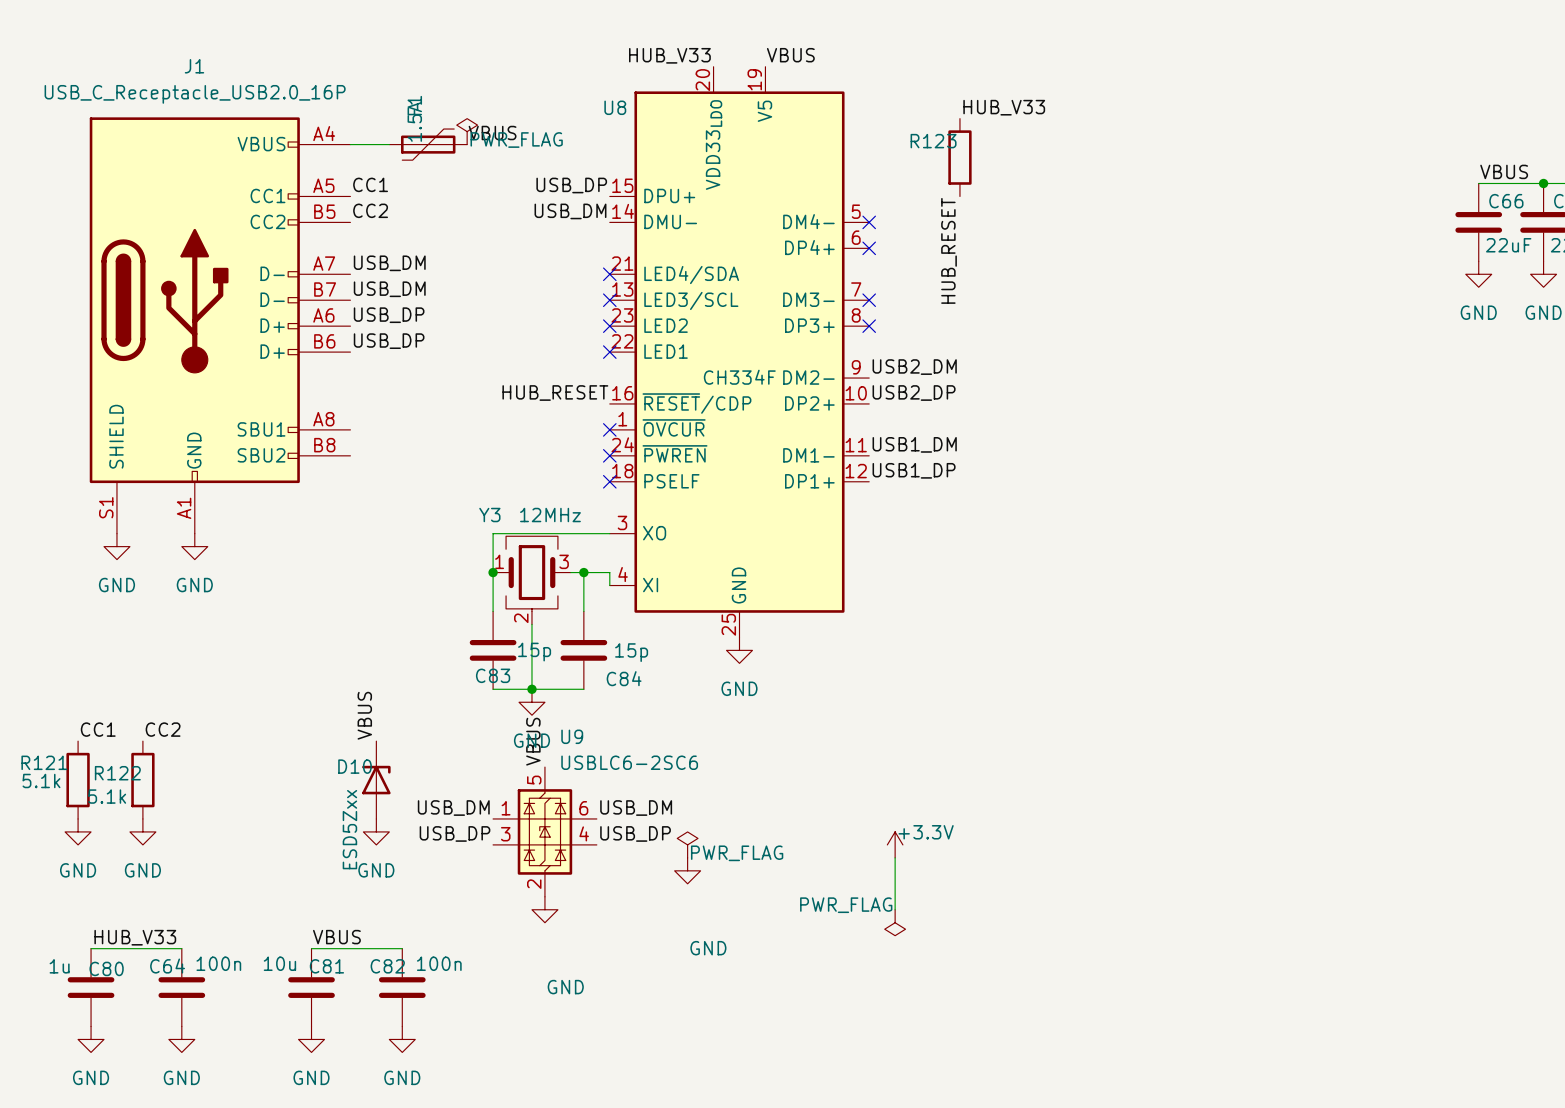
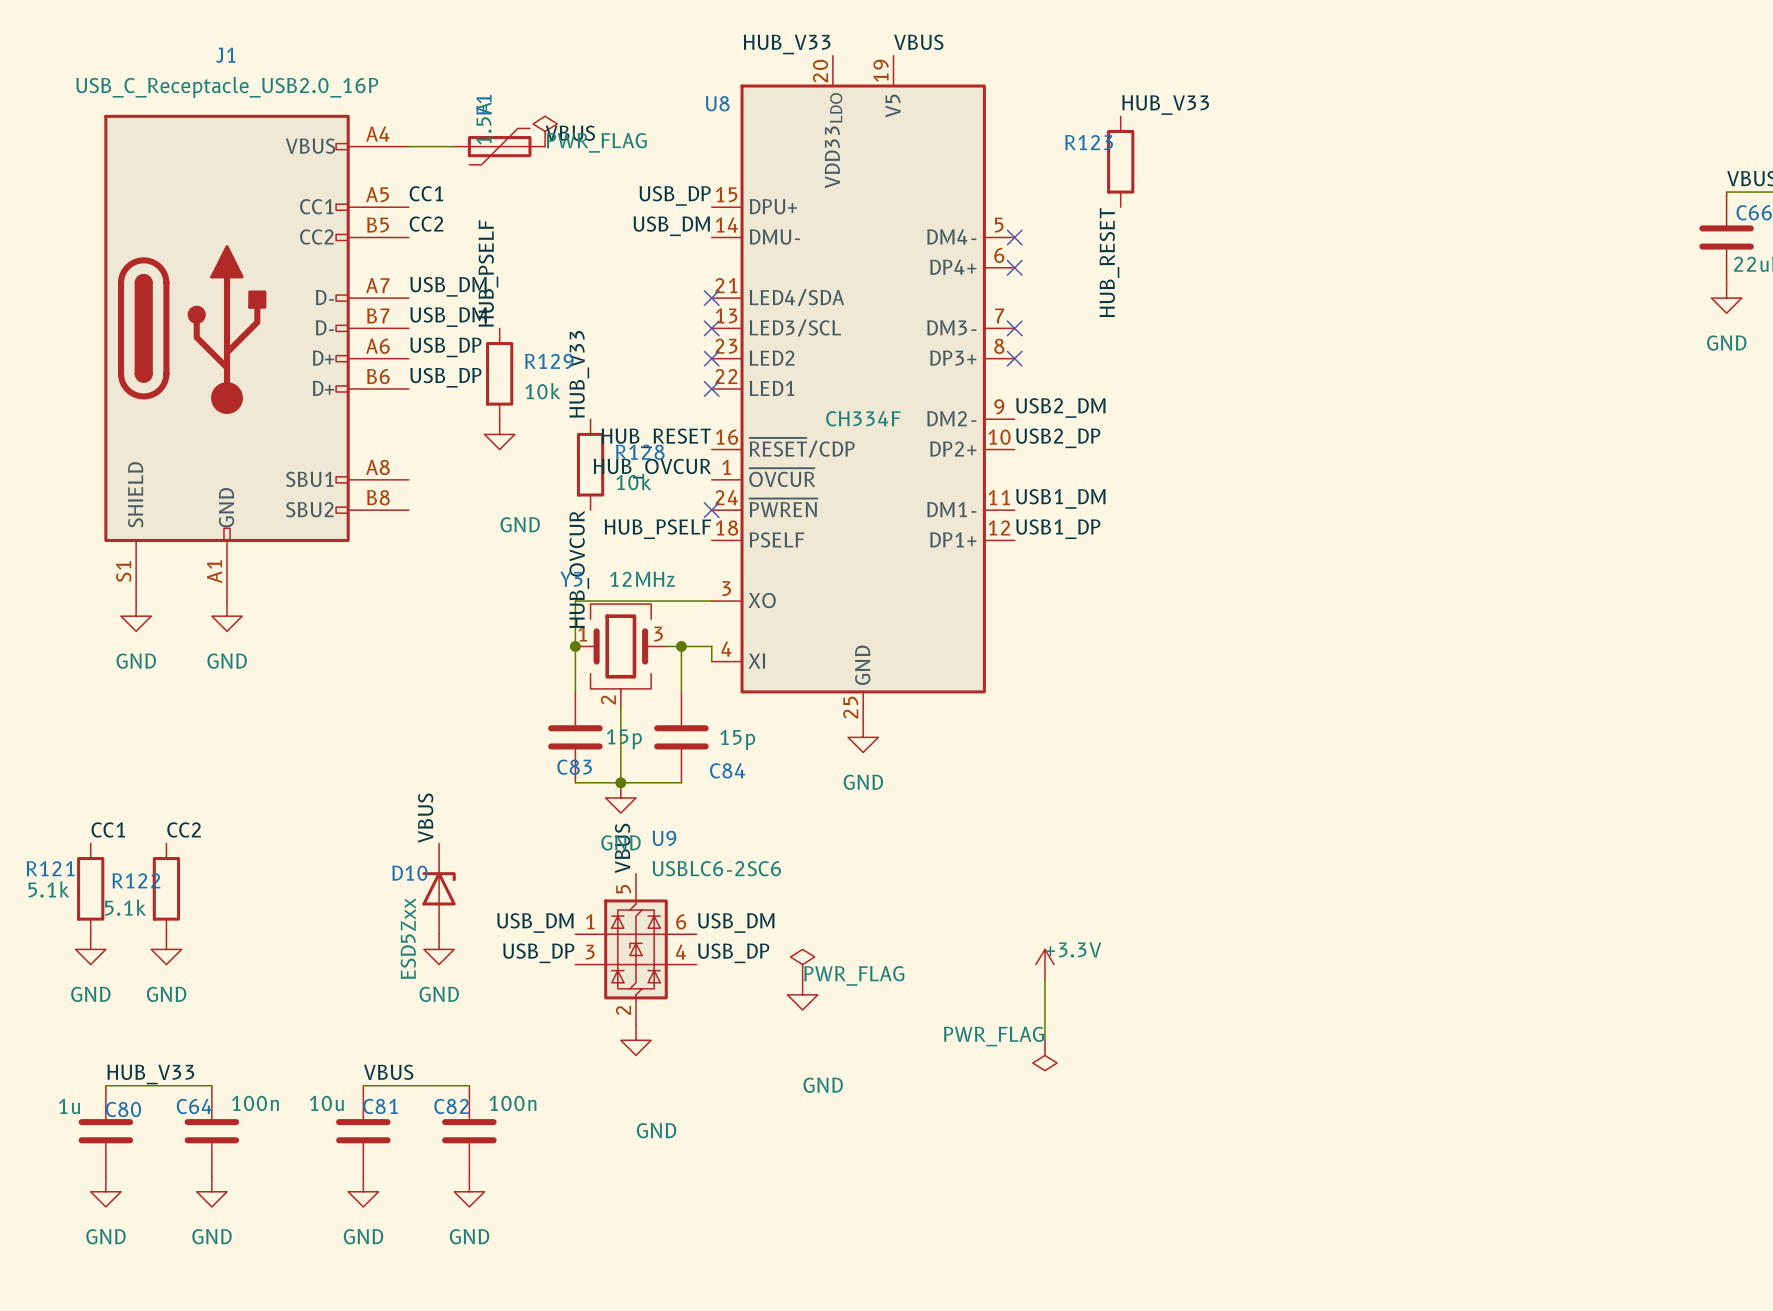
label: none -> HUB_PSELF (488, 273)
label: none -> HUB_V33 (579, 374)
R129: none -> 10k (499, 373)
power symbol: none -> GND (499, 434)
R128: none -> 10k (590, 464)
label: none -> HUB_OVCUR (652, 468)
no-connect mark: (609, 429) -> none
label: none -> HUB_PSELF (657, 529)
no-connect mark: (609, 481) -> none
label: none -> HUB_OVCUR (579, 569)

